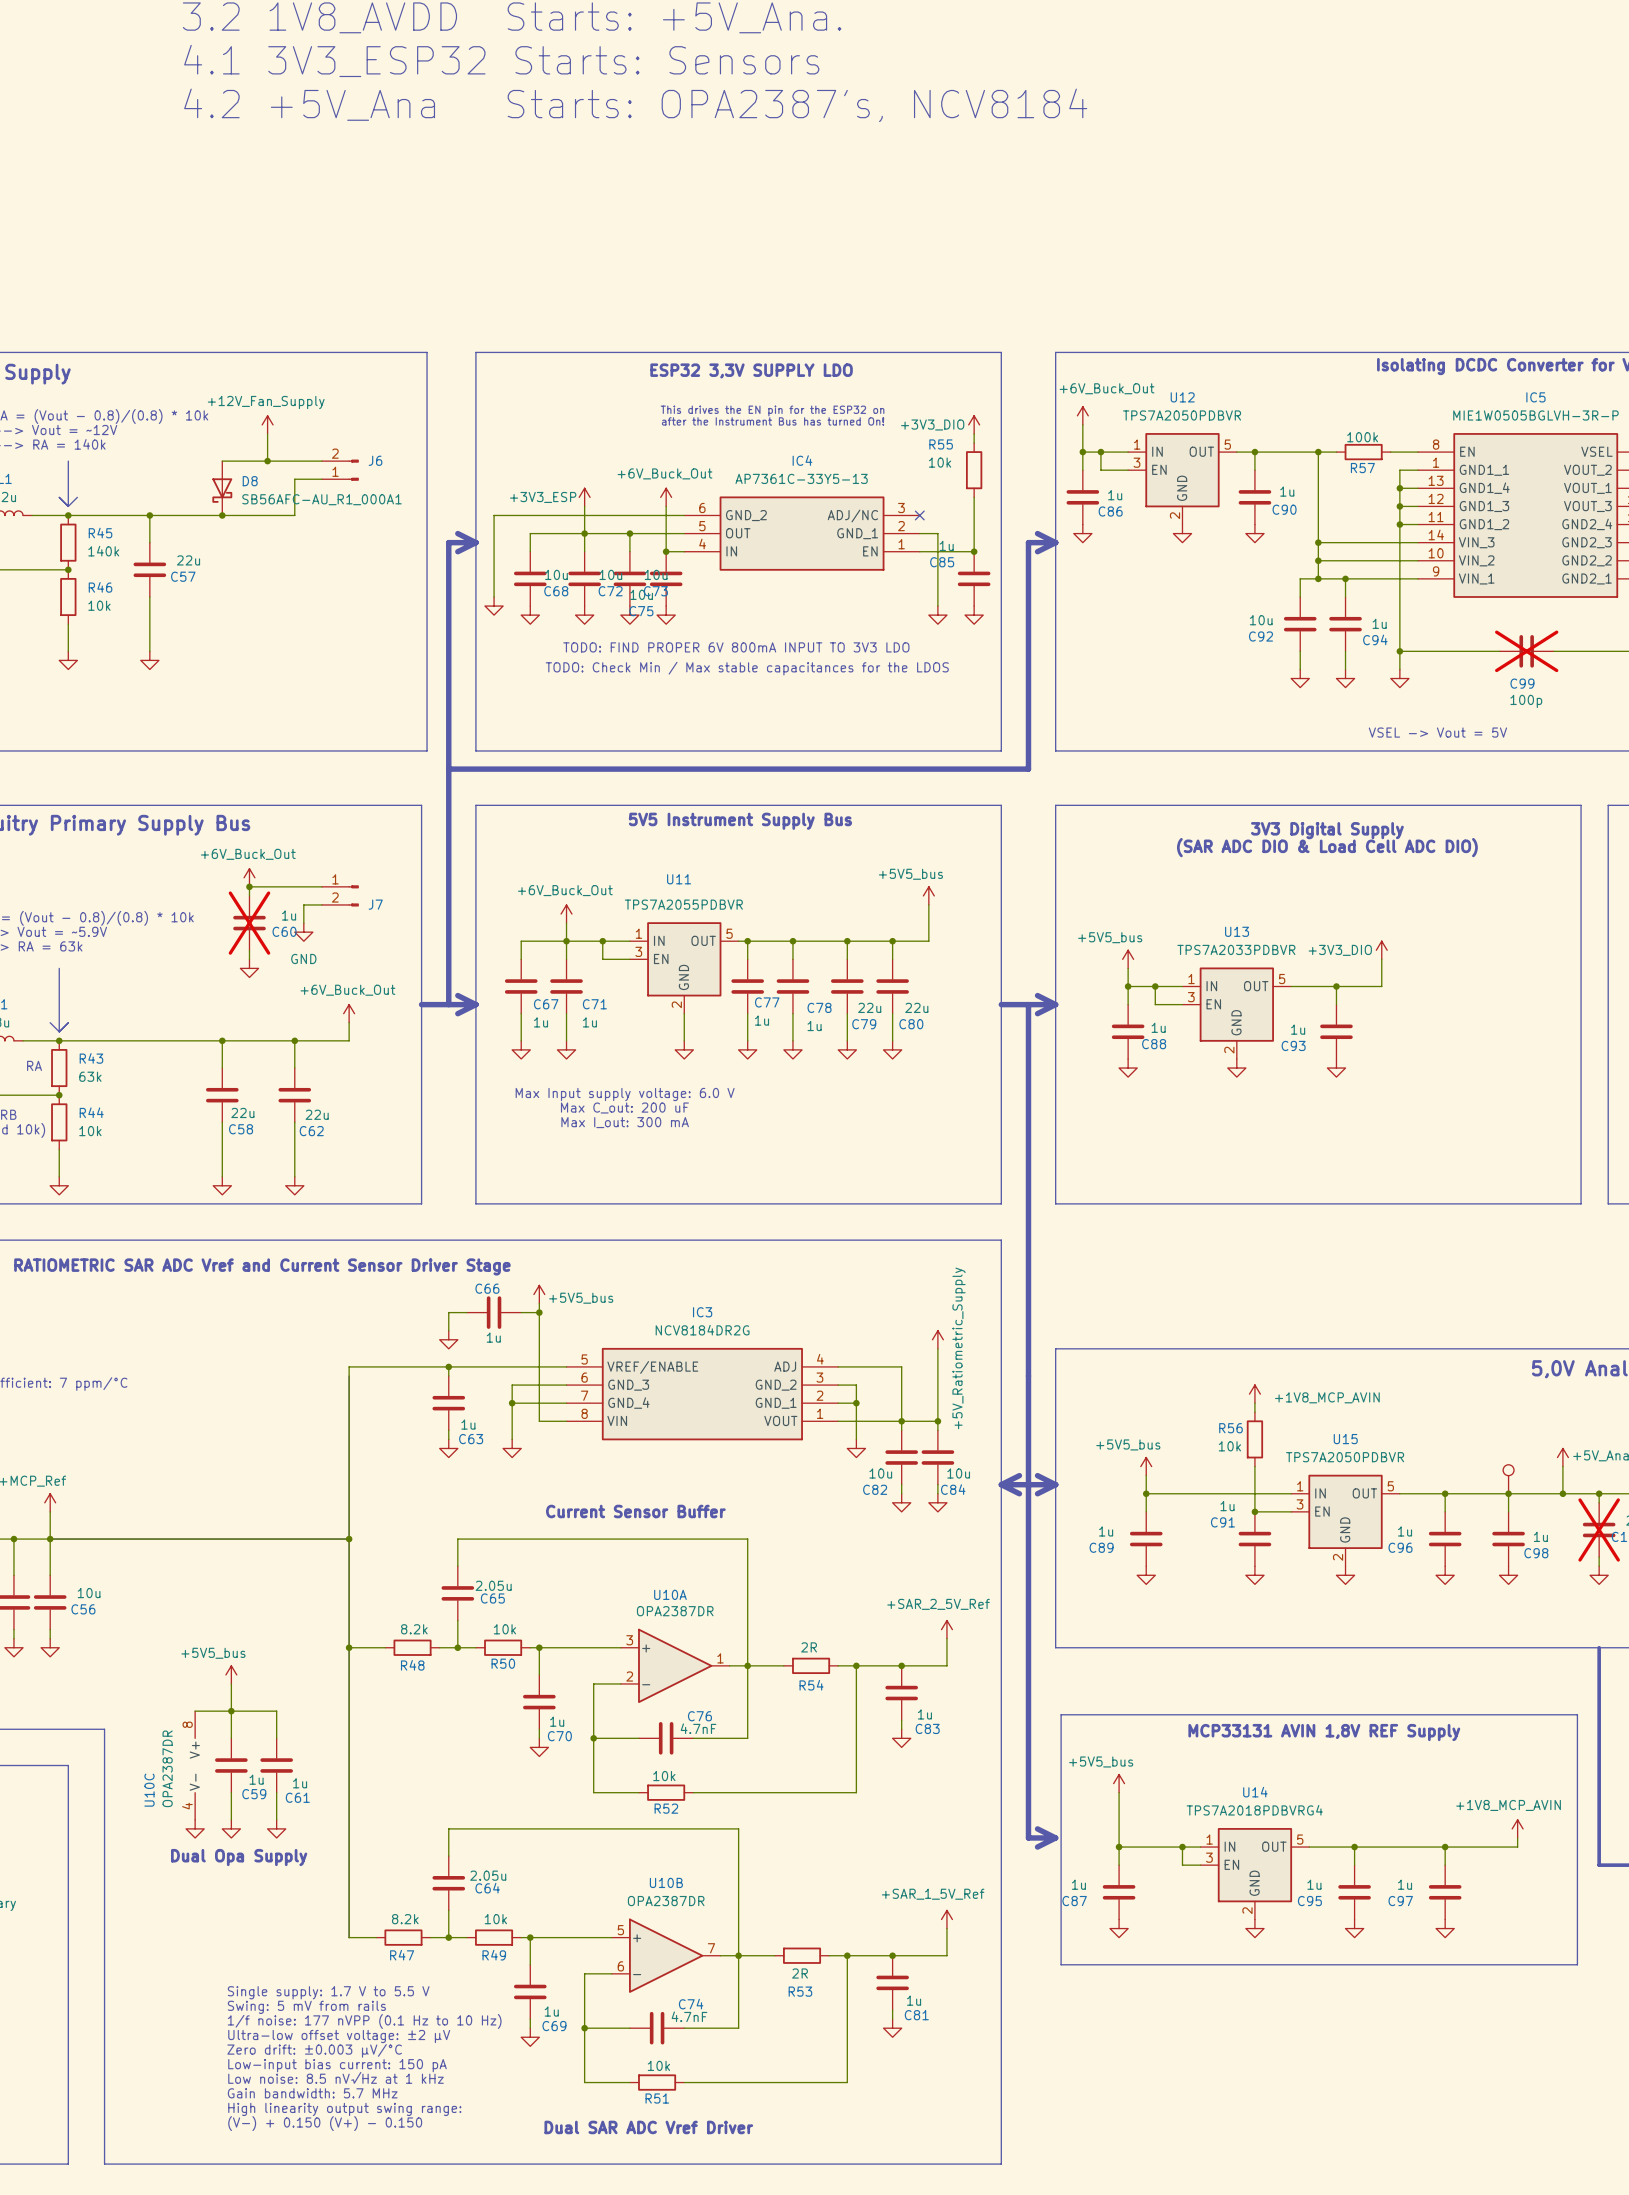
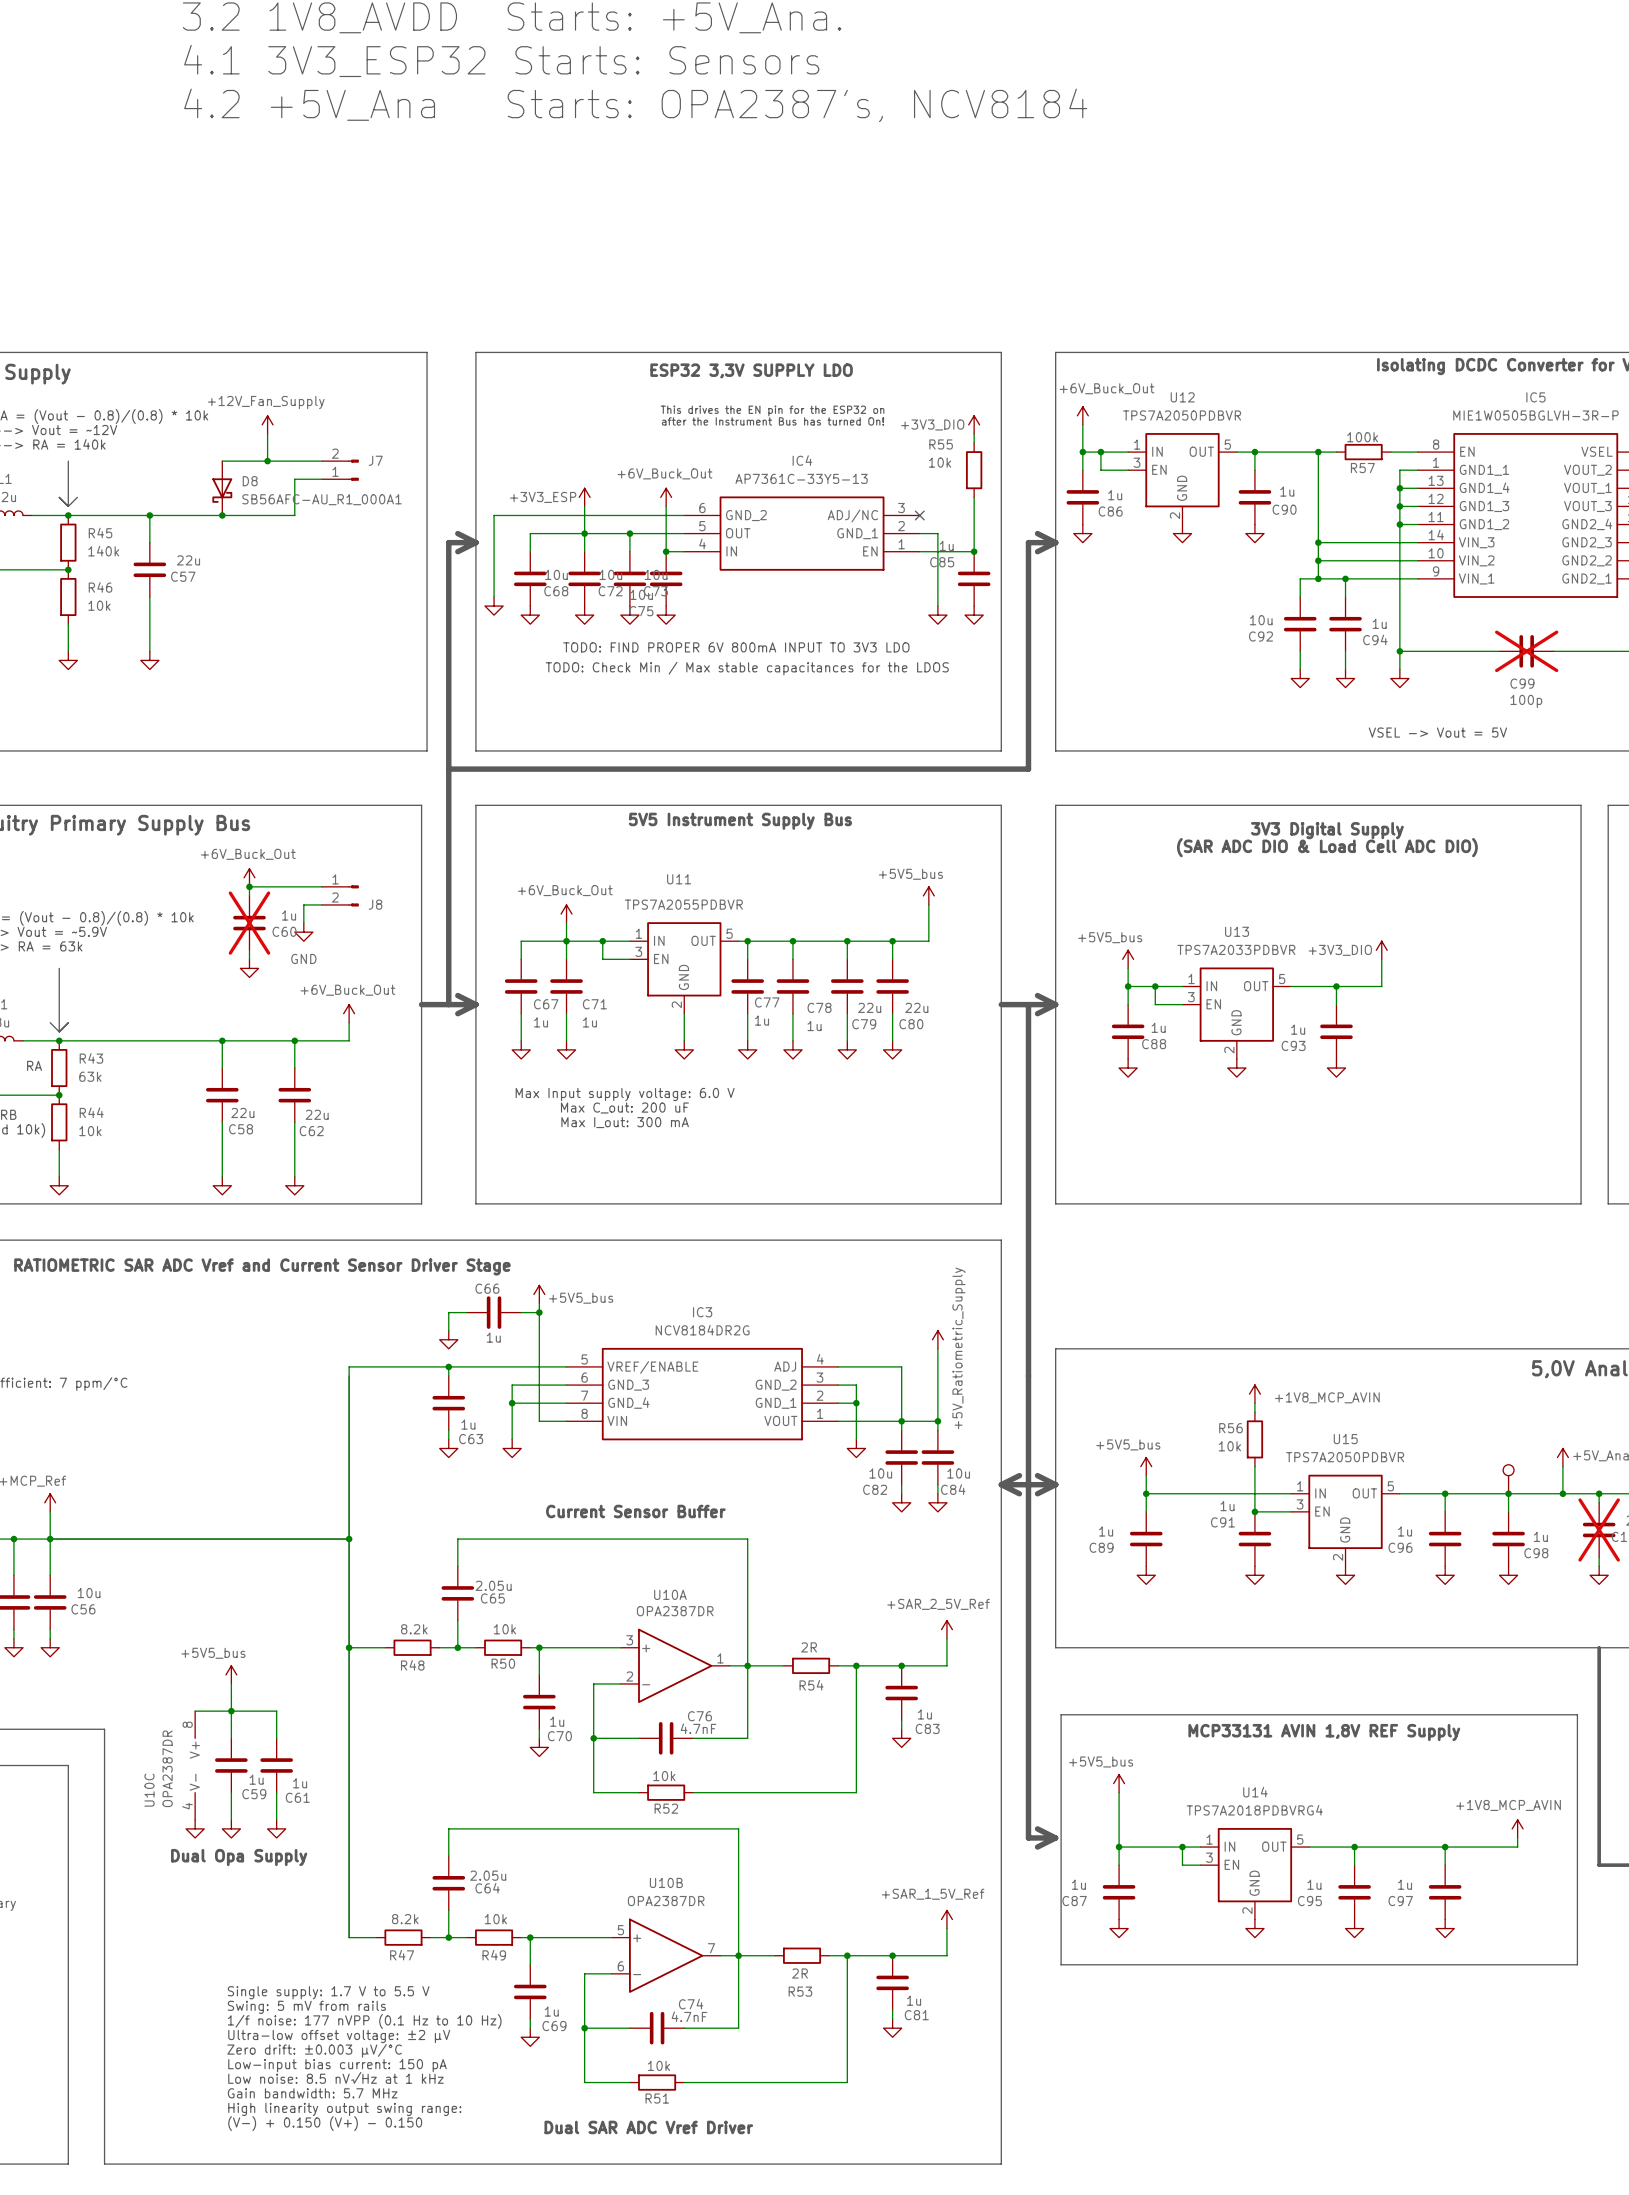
J6 name: J6 (375, 460) -> J7 (375, 460)
J7 name: J7 (375, 904) -> J8 (375, 904)

